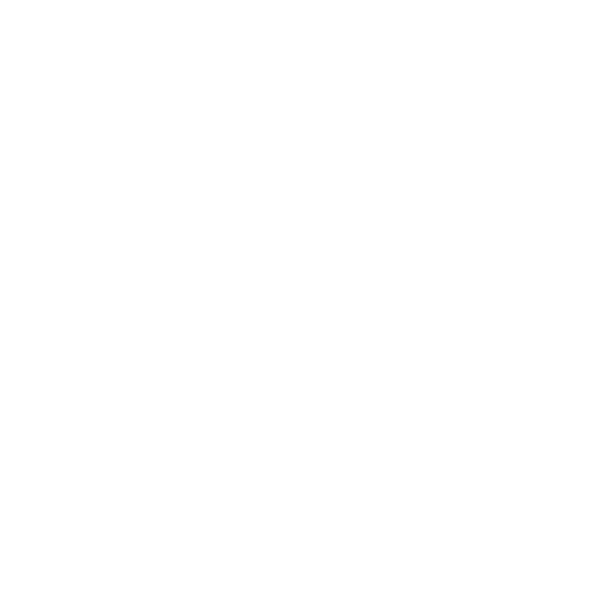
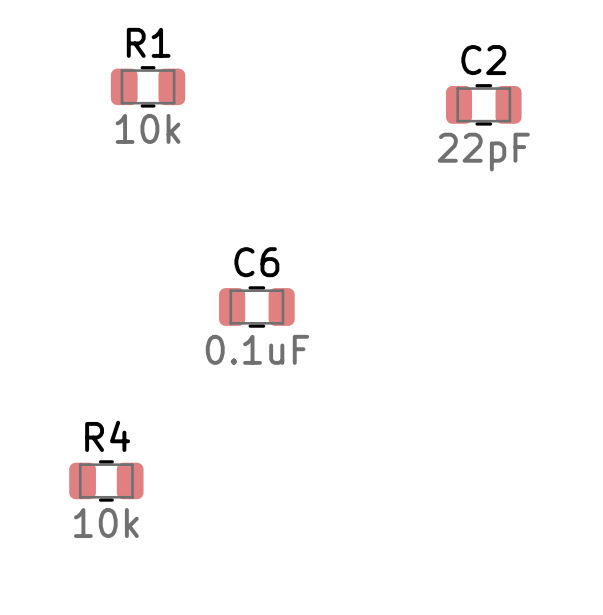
R1: none -> 10k (148, 86)
C2: none -> 22pF (483, 104)
C6: none -> 0.1uF (256, 306)
R4: none -> 10k (106, 480)

